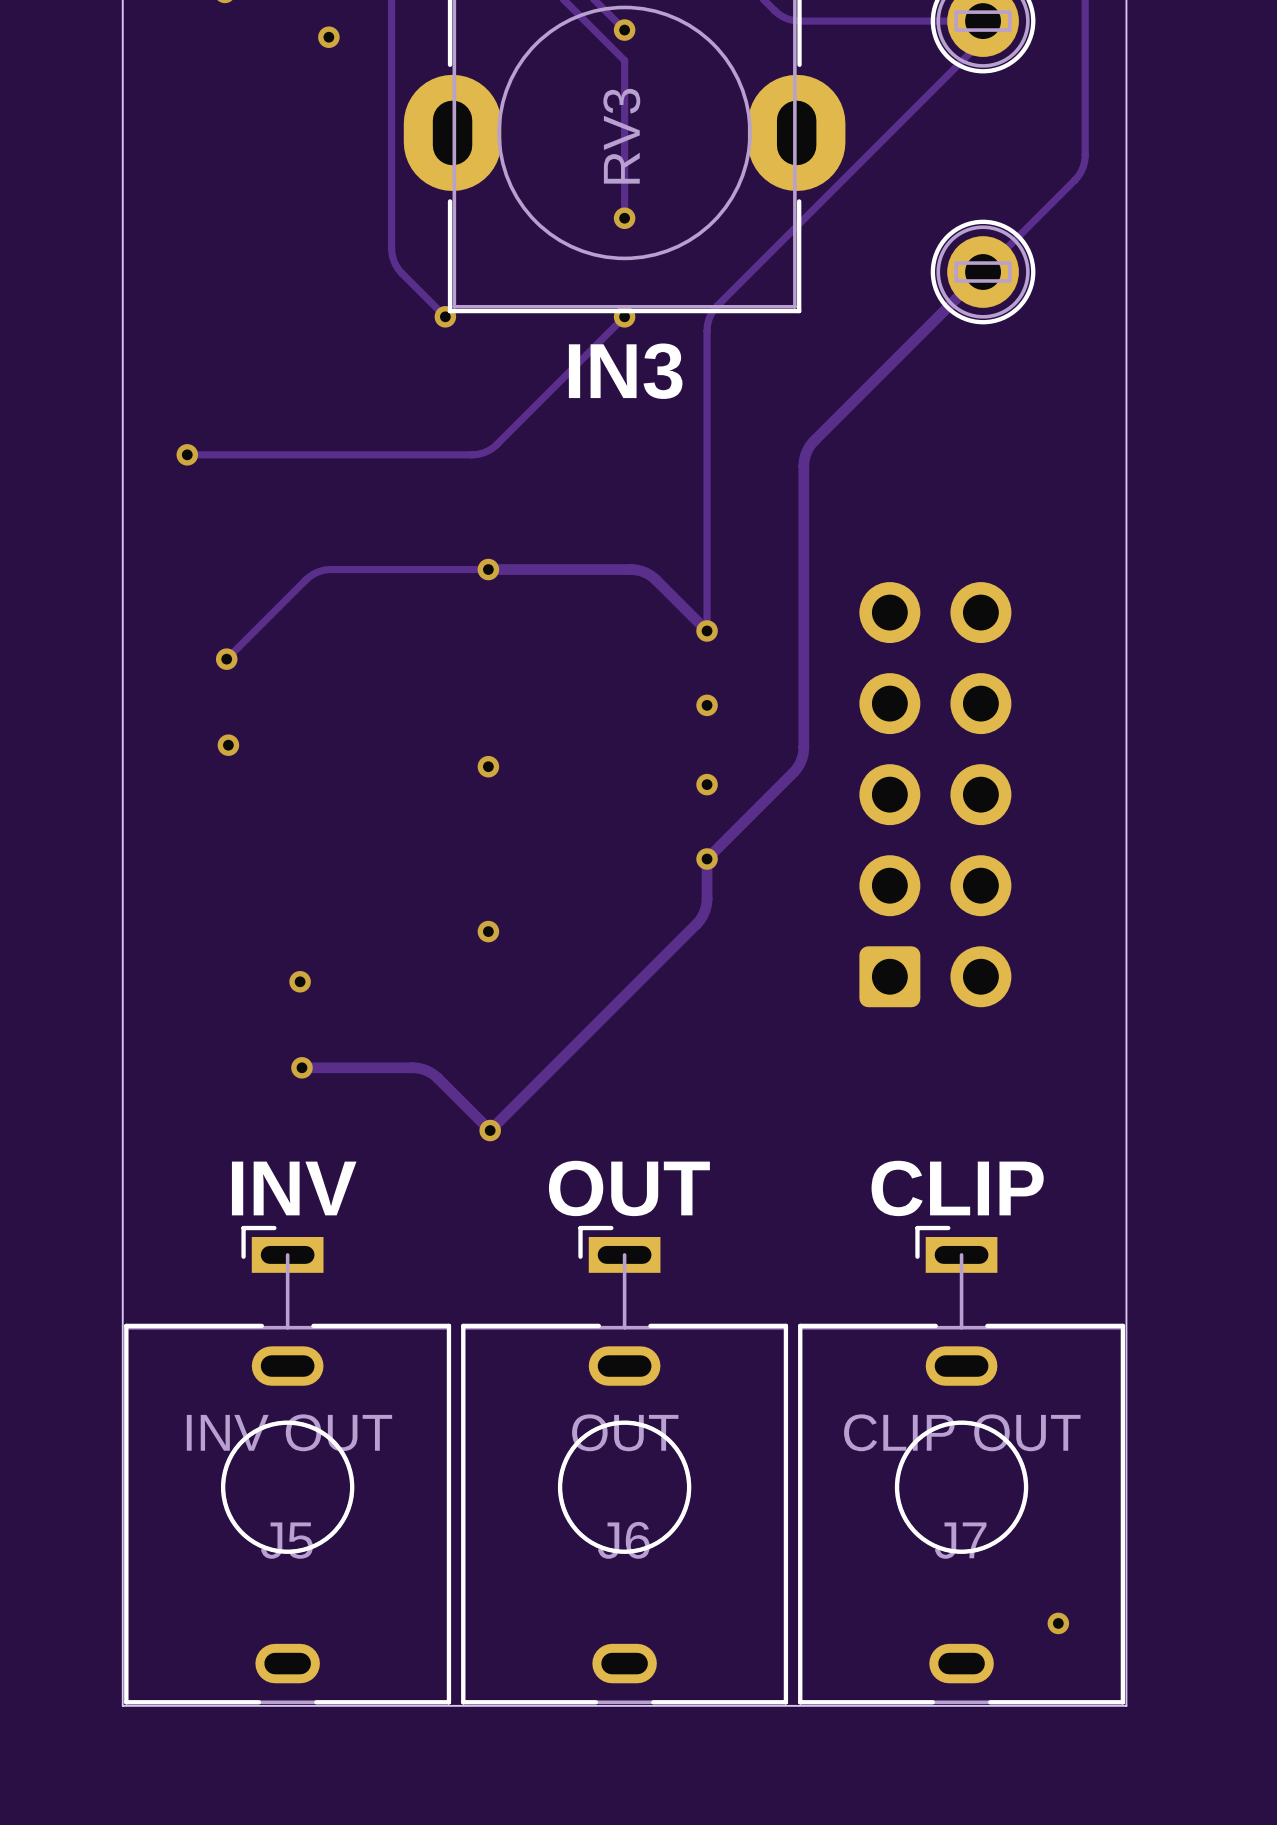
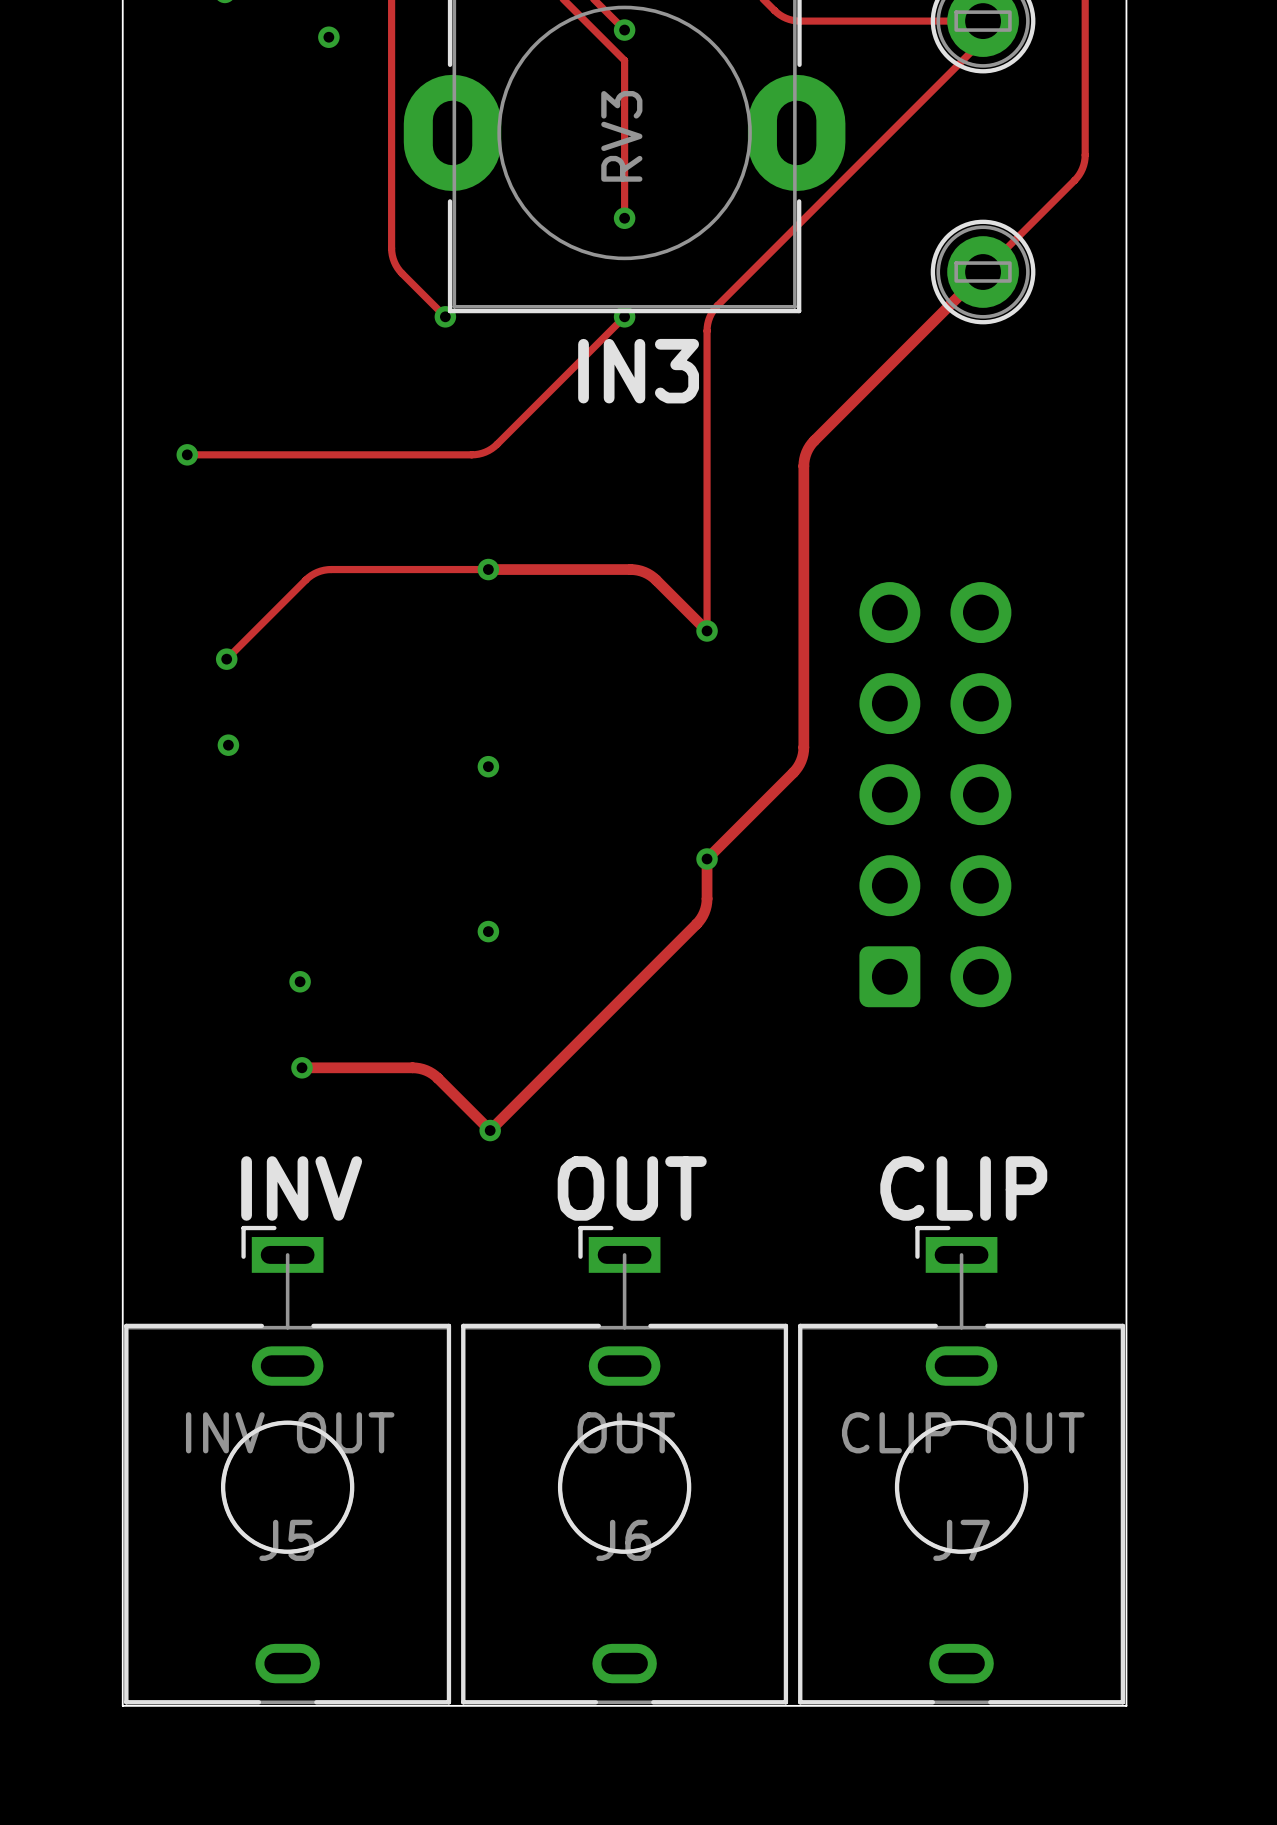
via: (707, 705) -> none
via: (707, 784) -> none
via: (1058, 1623) -> none

